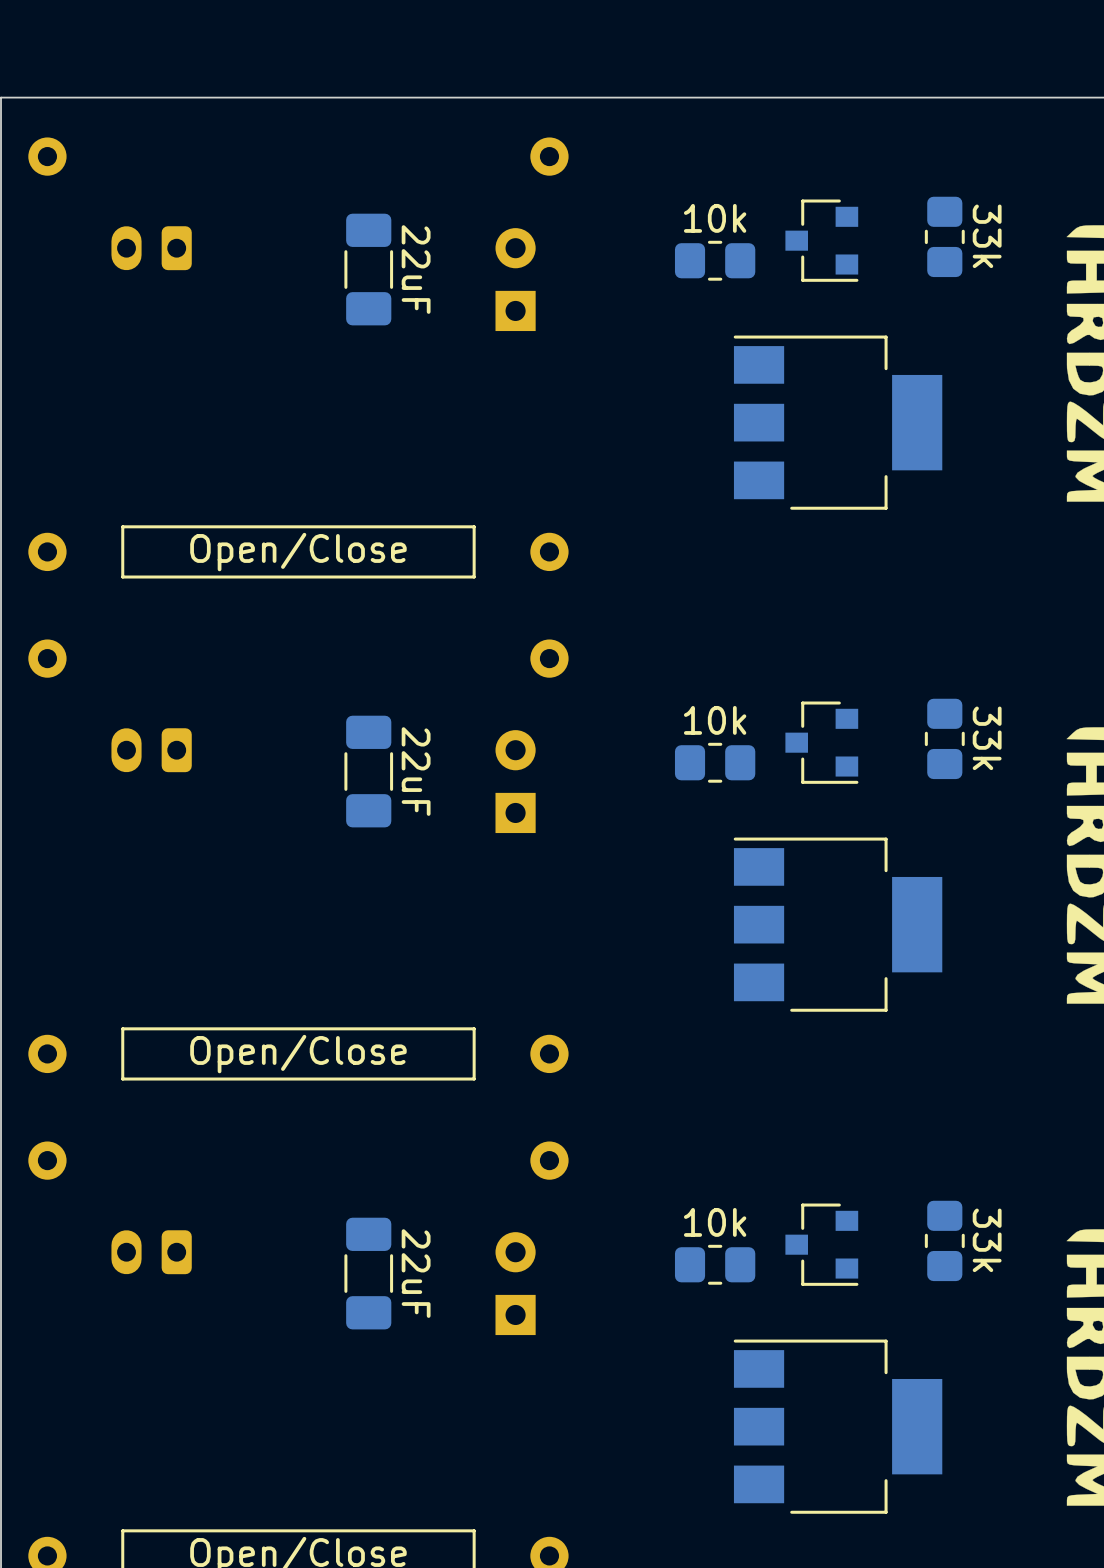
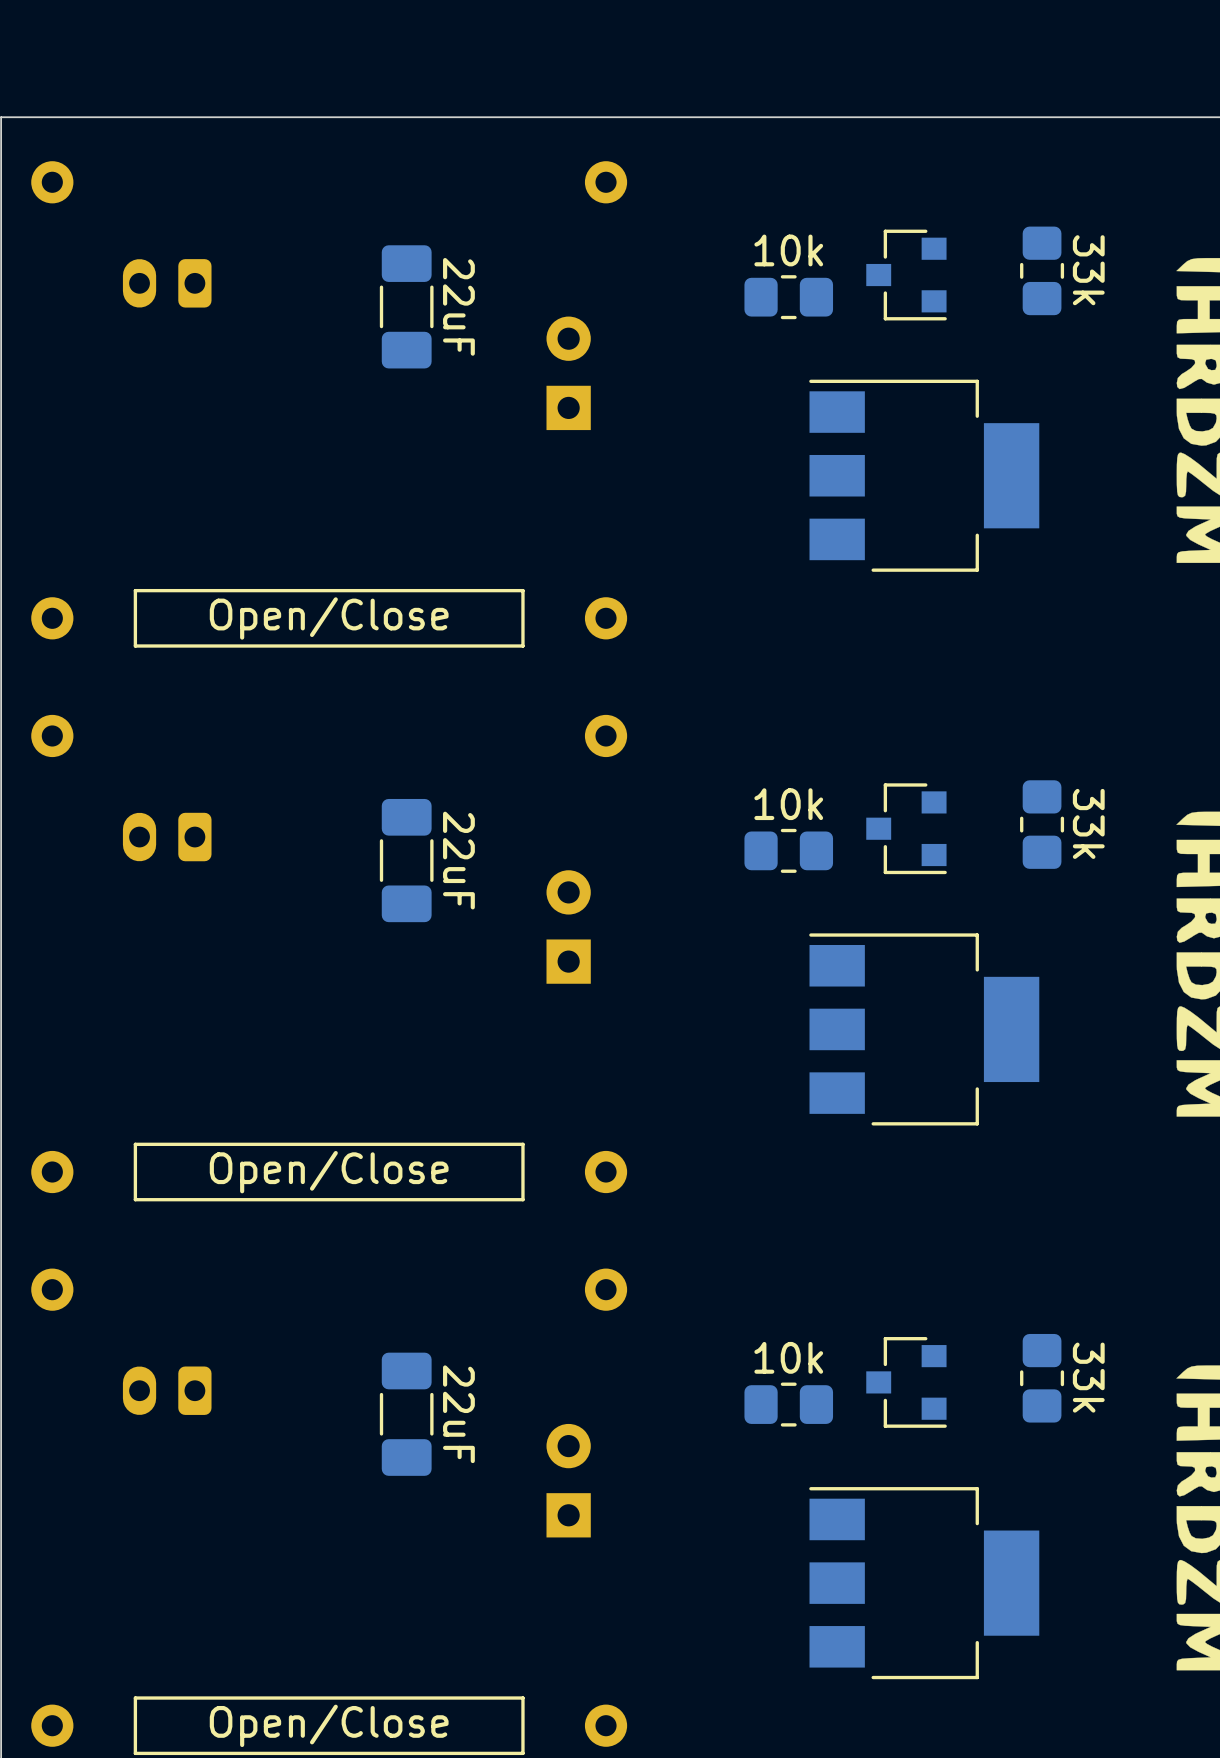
part position: (515, 279) -> (568, 373)
part position: (515, 781) -> (568, 927)
part position: (515, 1283) -> (568, 1480)

